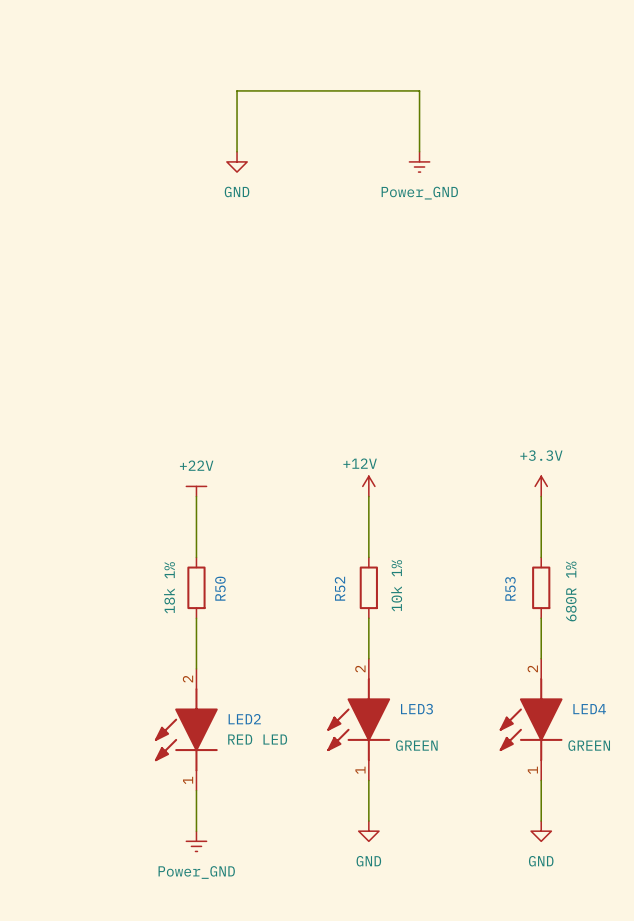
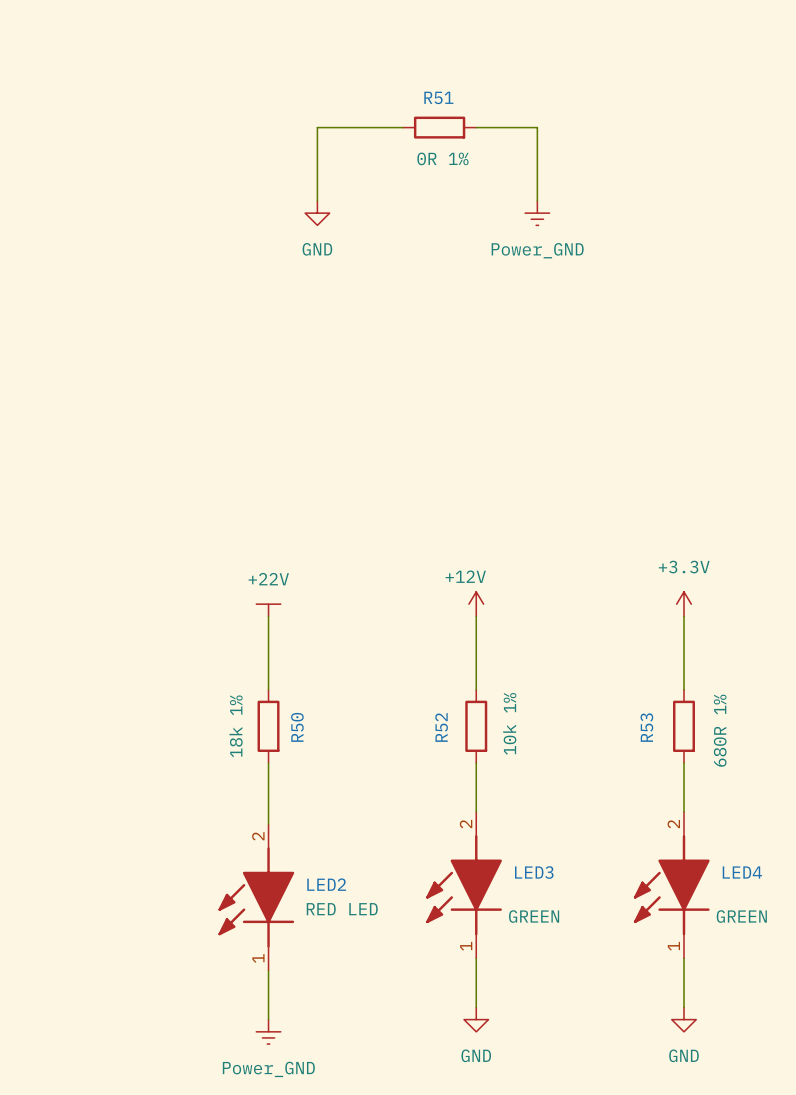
wire: (308, 90) (368, 90) -> none
R51: none -> 0R 1% (439, 127)

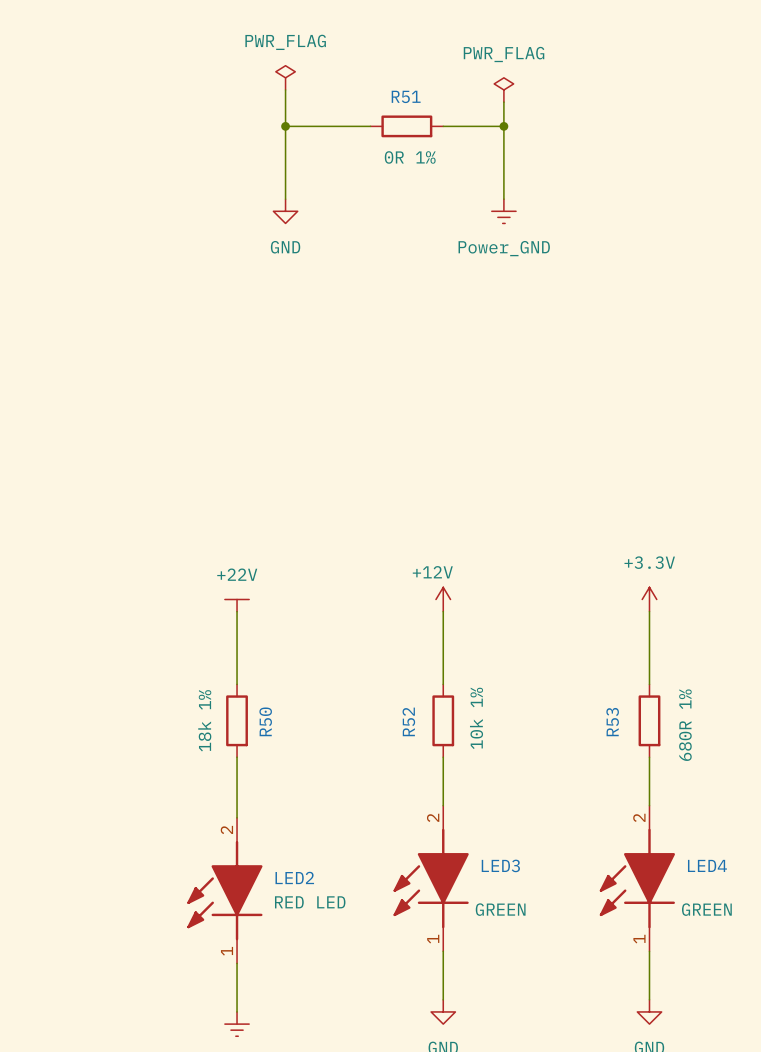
power symbol: none -> PWR_FLAG (285, 77)
wire: none -> (285, 89) (285, 126)
power symbol: none -> PWR_FLAG (503, 89)
wire: none -> (503, 102) (503, 126)
junction: none -> (285, 126)
junction: none -> (503, 126)

